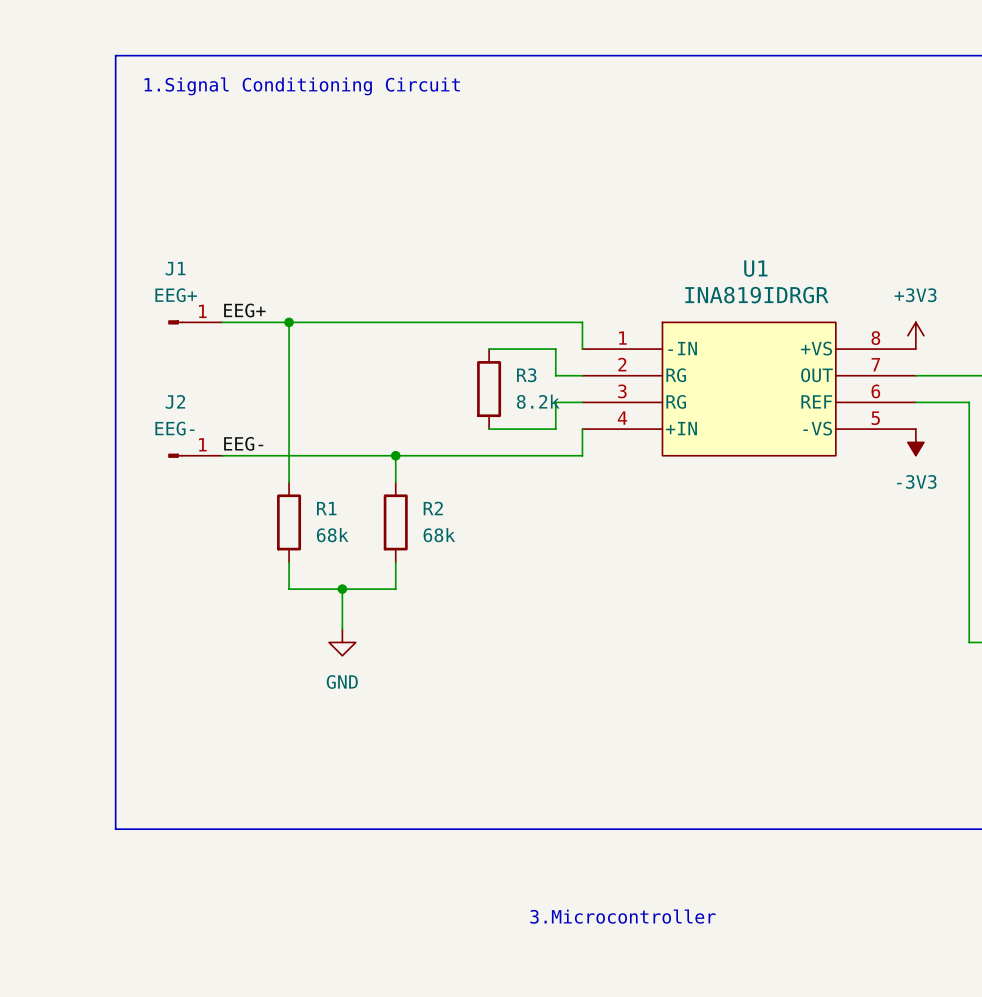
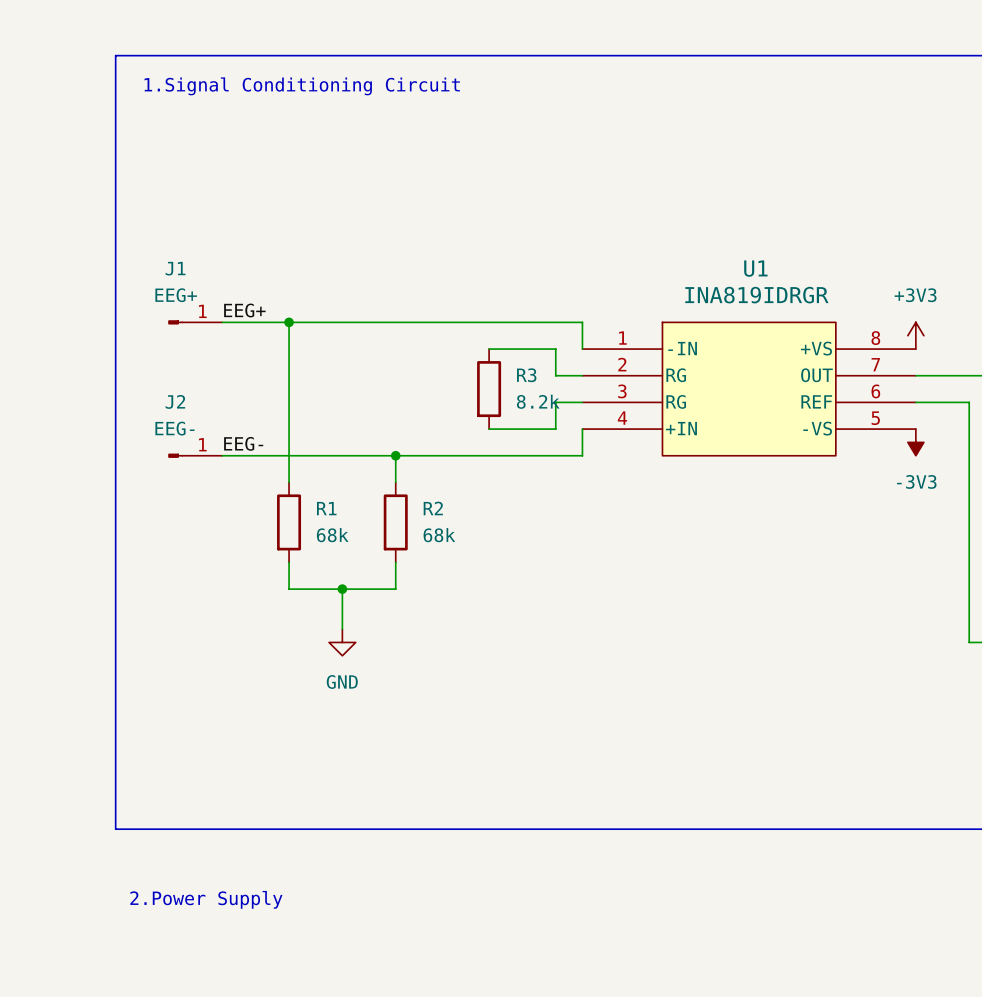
text: none -> 2.Power Supply (206, 899)
text: 3.Microcontroller (622, 916) -> none

